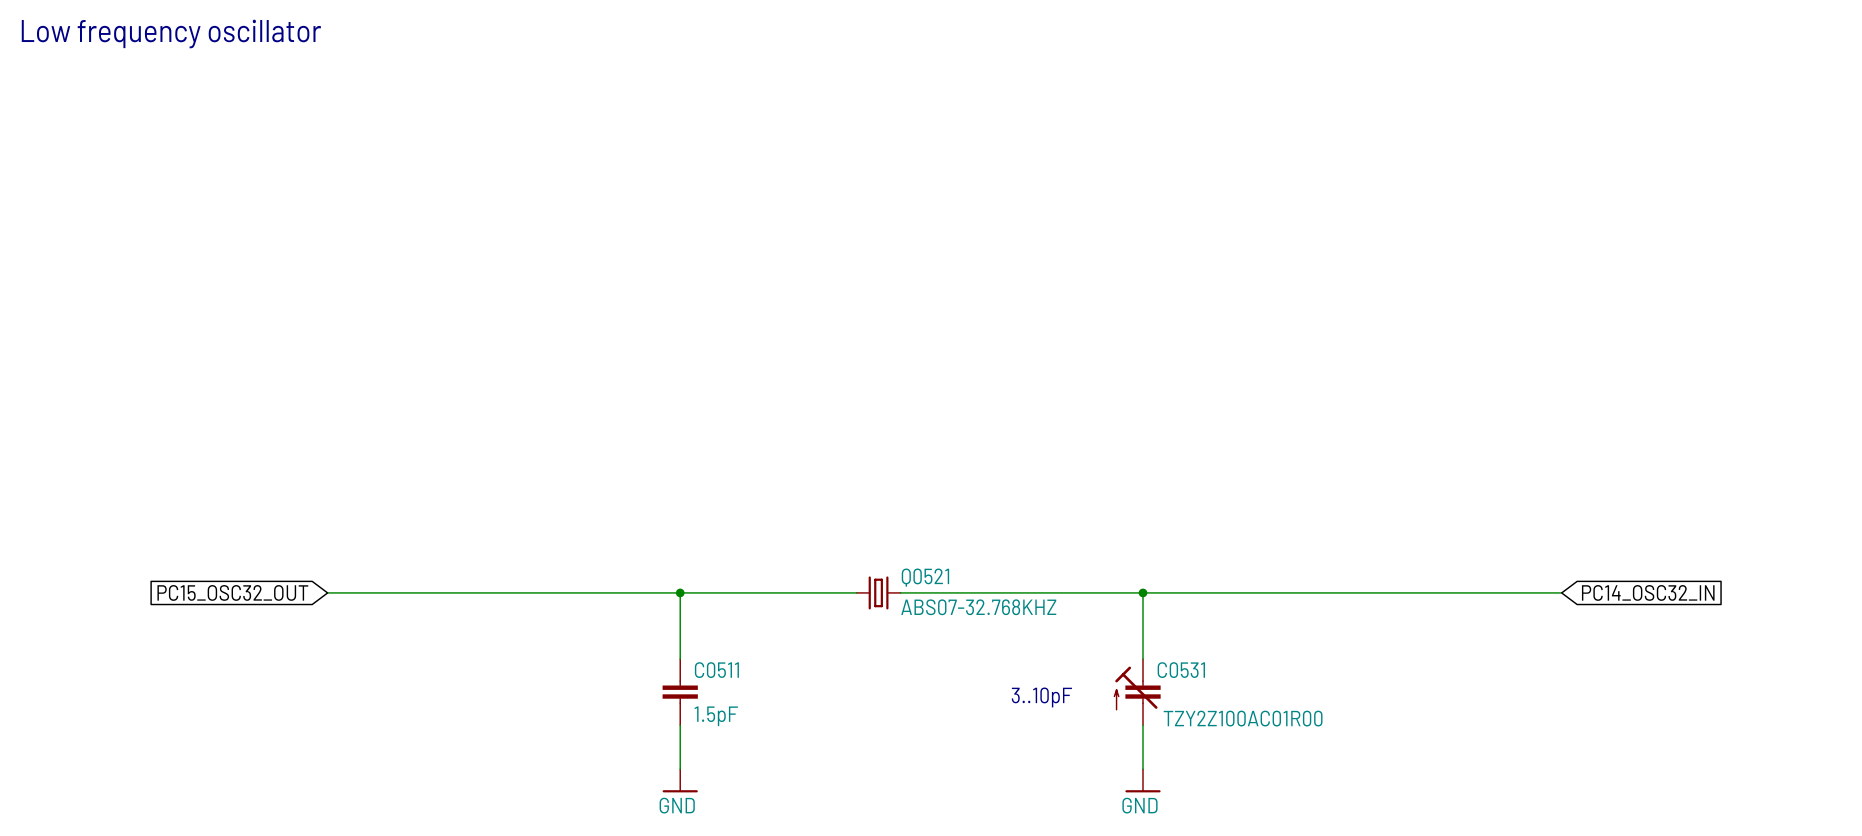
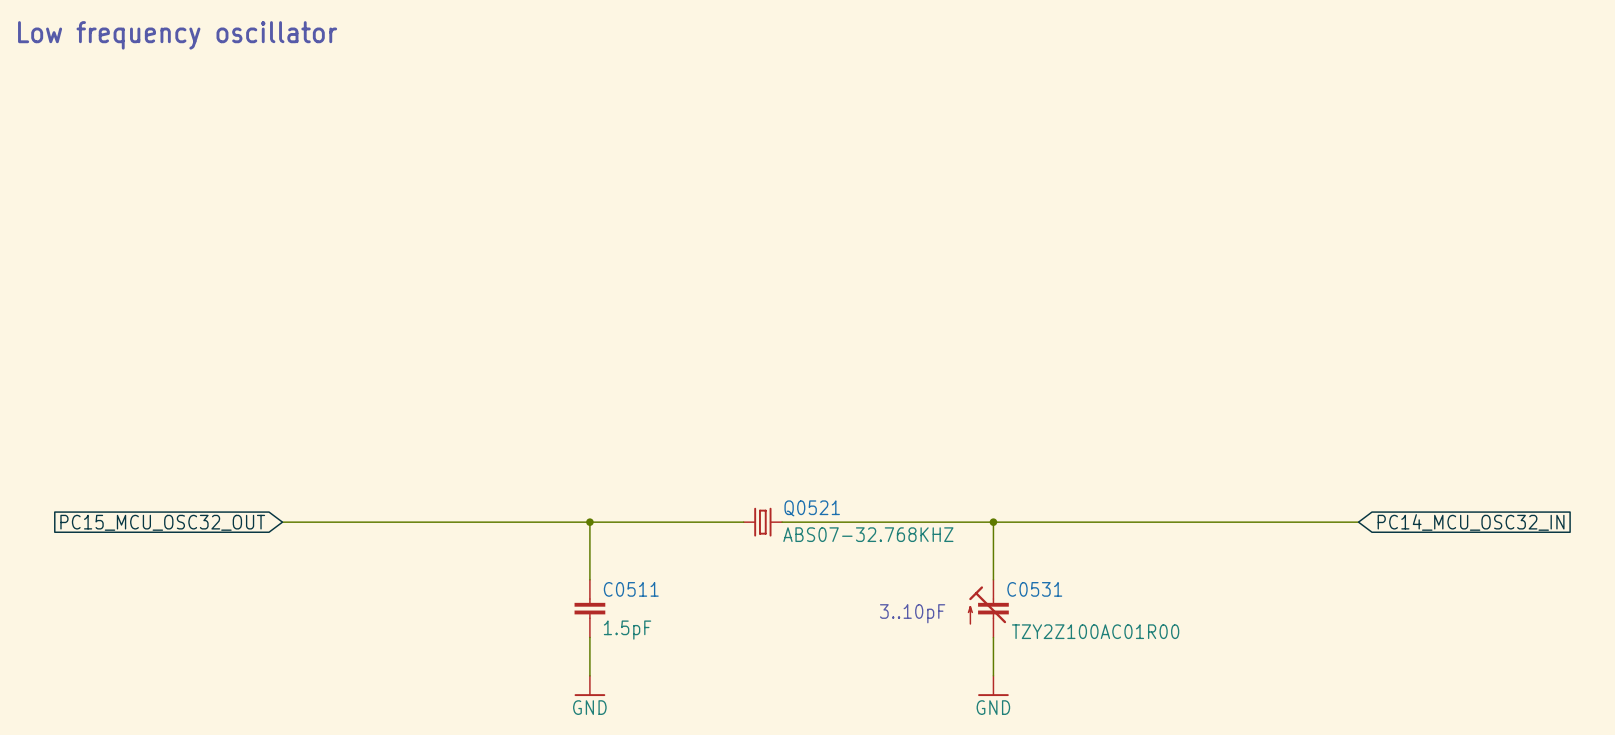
global label: PC15_OSC32_OUT (232, 592) -> PC15_MCU_OSC32_OUT (162, 522)
global label: PC14_OSC32_IN (1648, 592) -> PC14_MCU_OSC32_IN (1471, 522)

